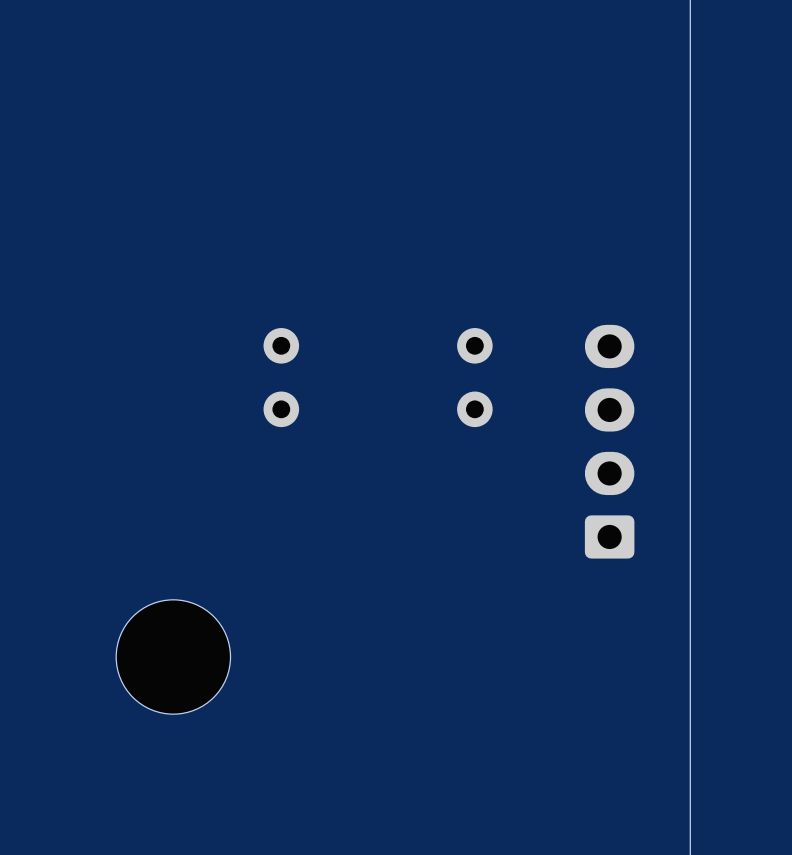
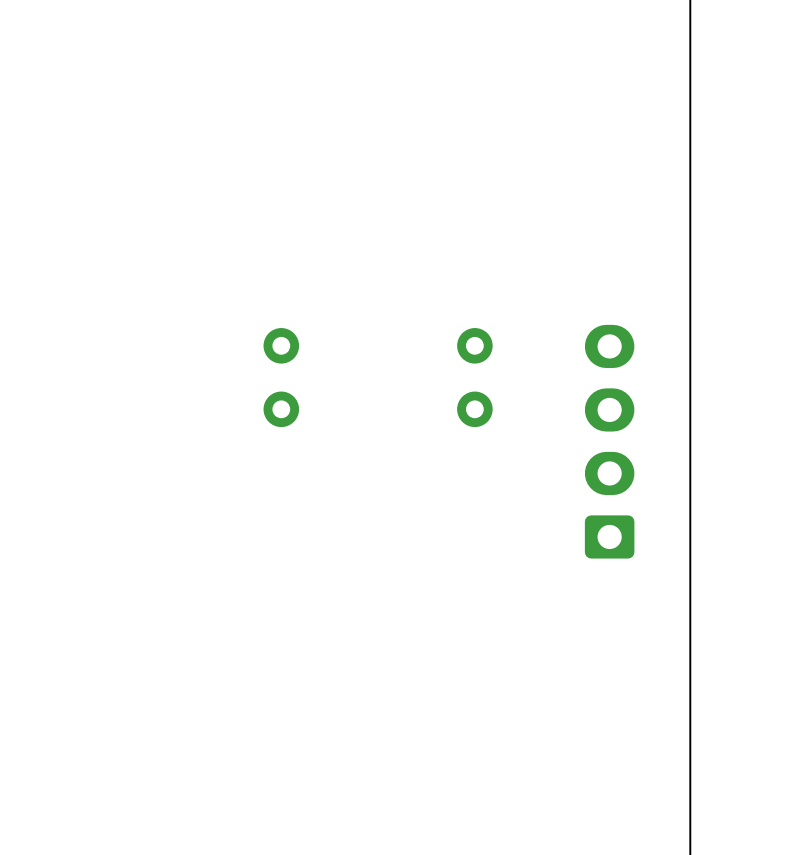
part: (173, 656) -> none

